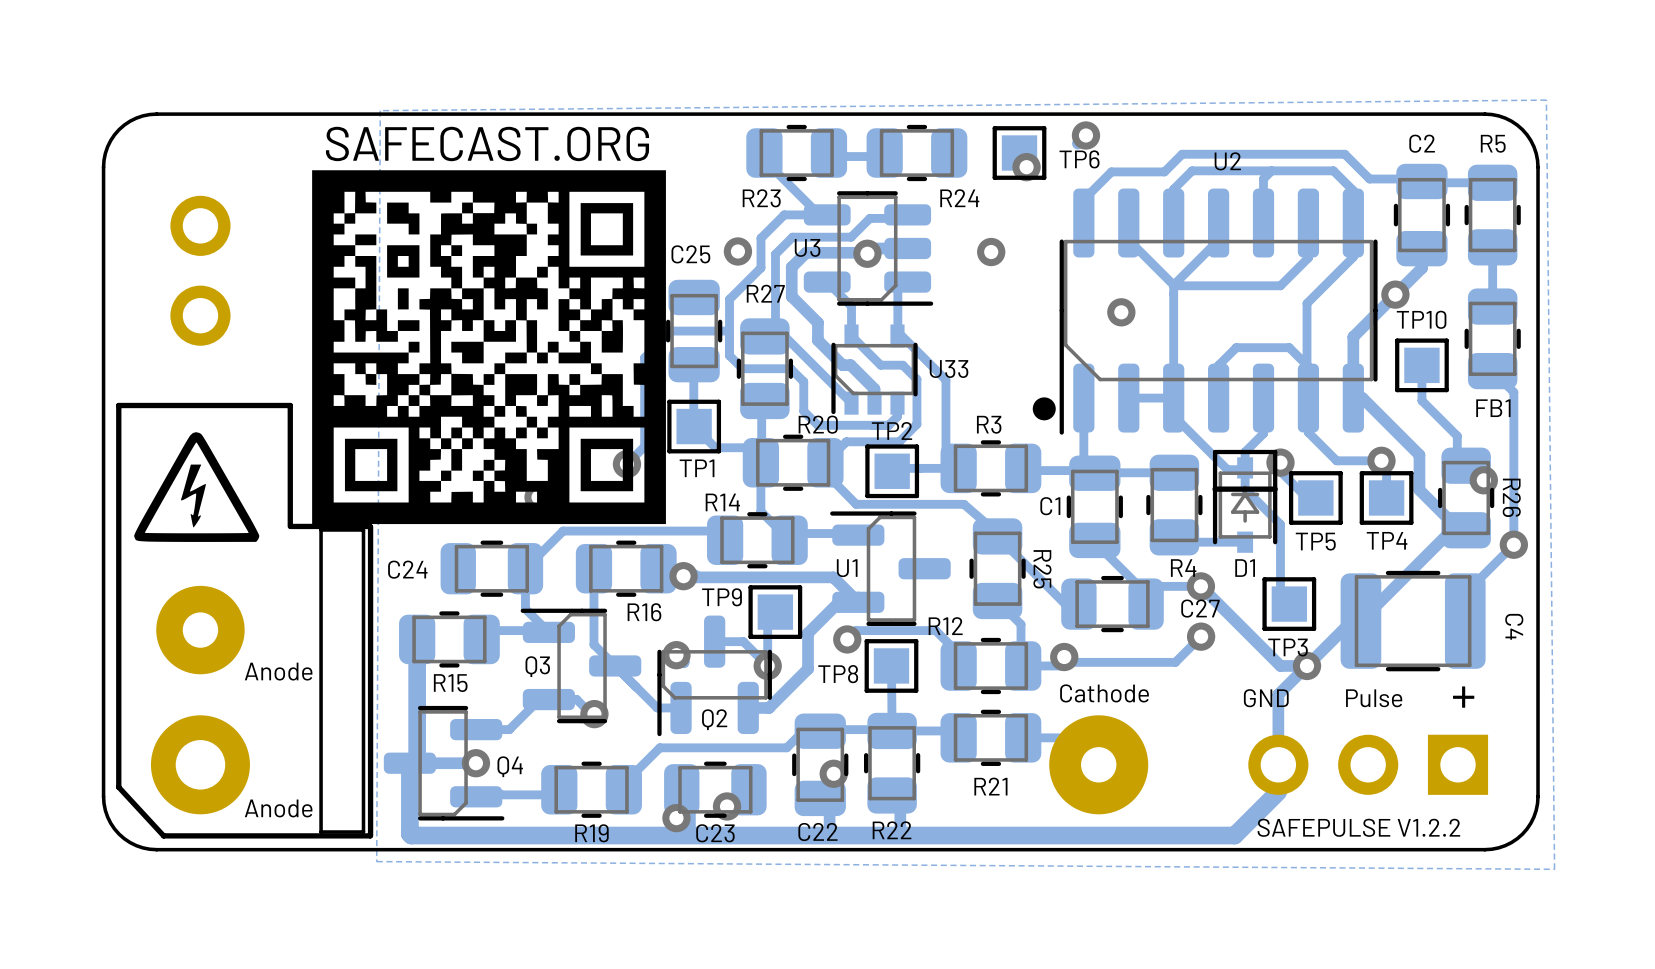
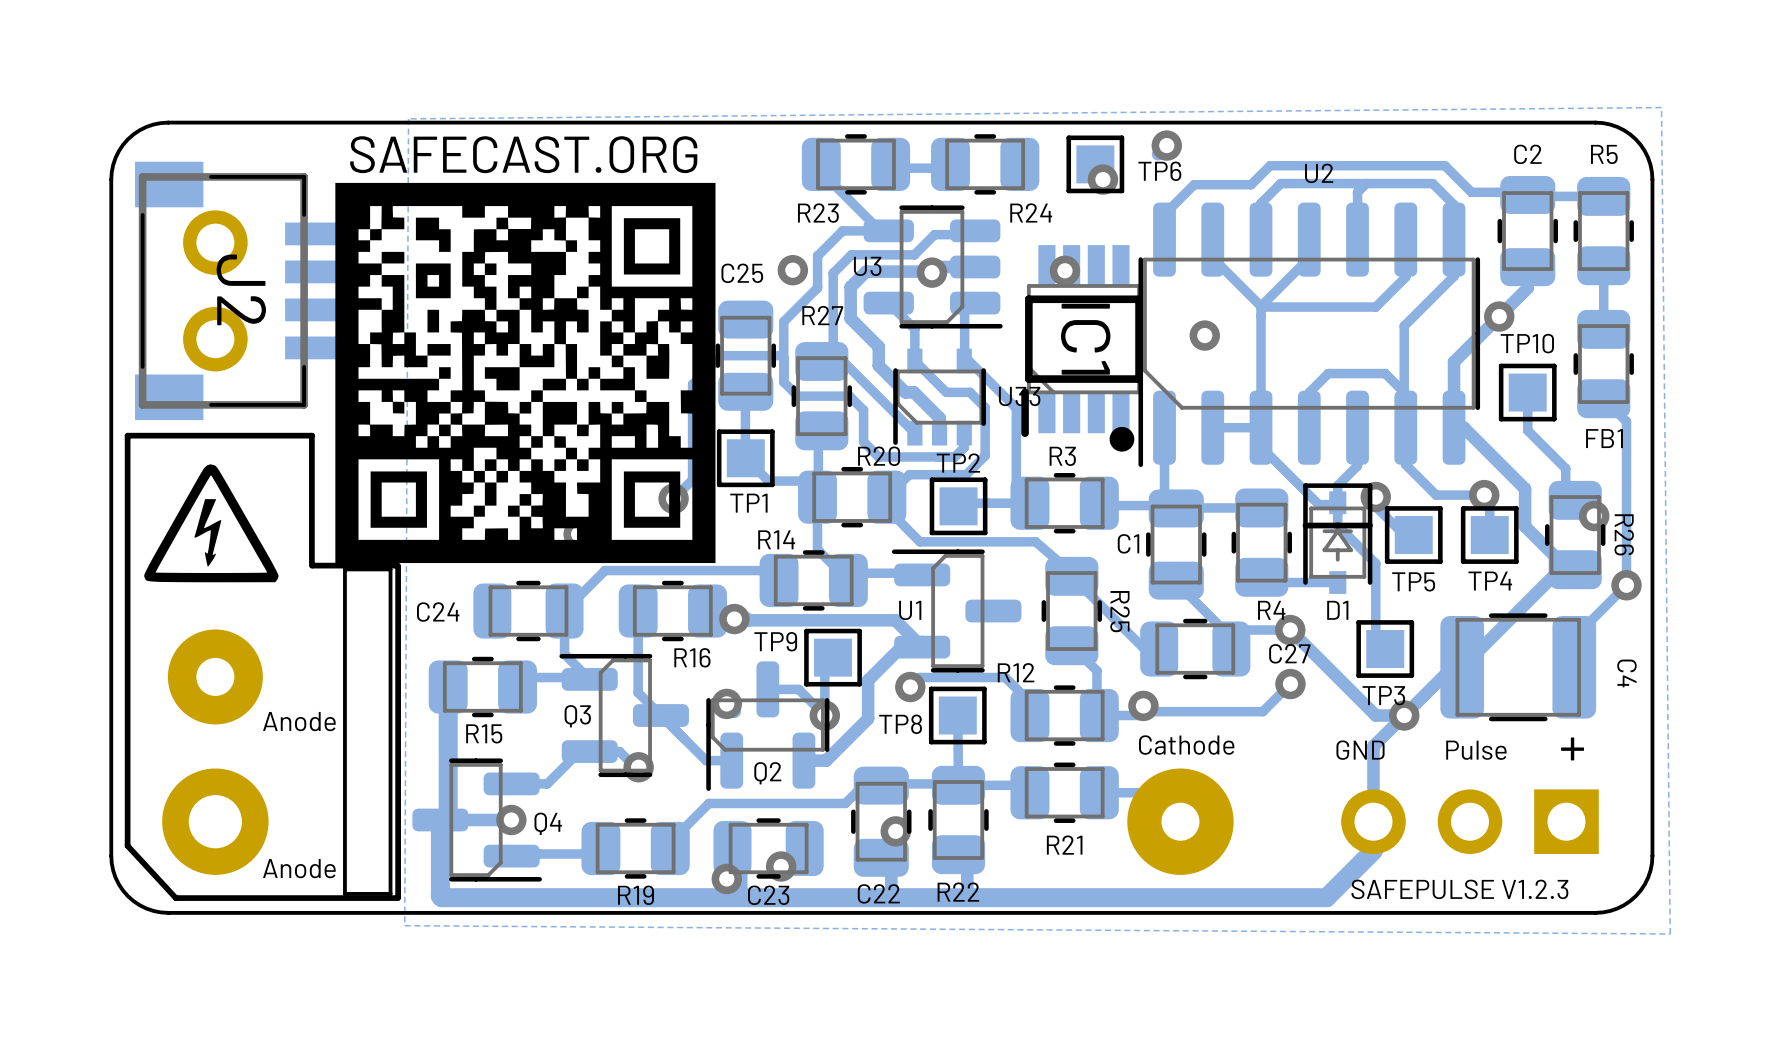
J2: none -> (239, 290)
IC1: none -> (1082, 341)
text: SAFEPULSE V1.2.2 (1358, 827) -> SAFEPULSE V1.2.3 (1459, 889)

